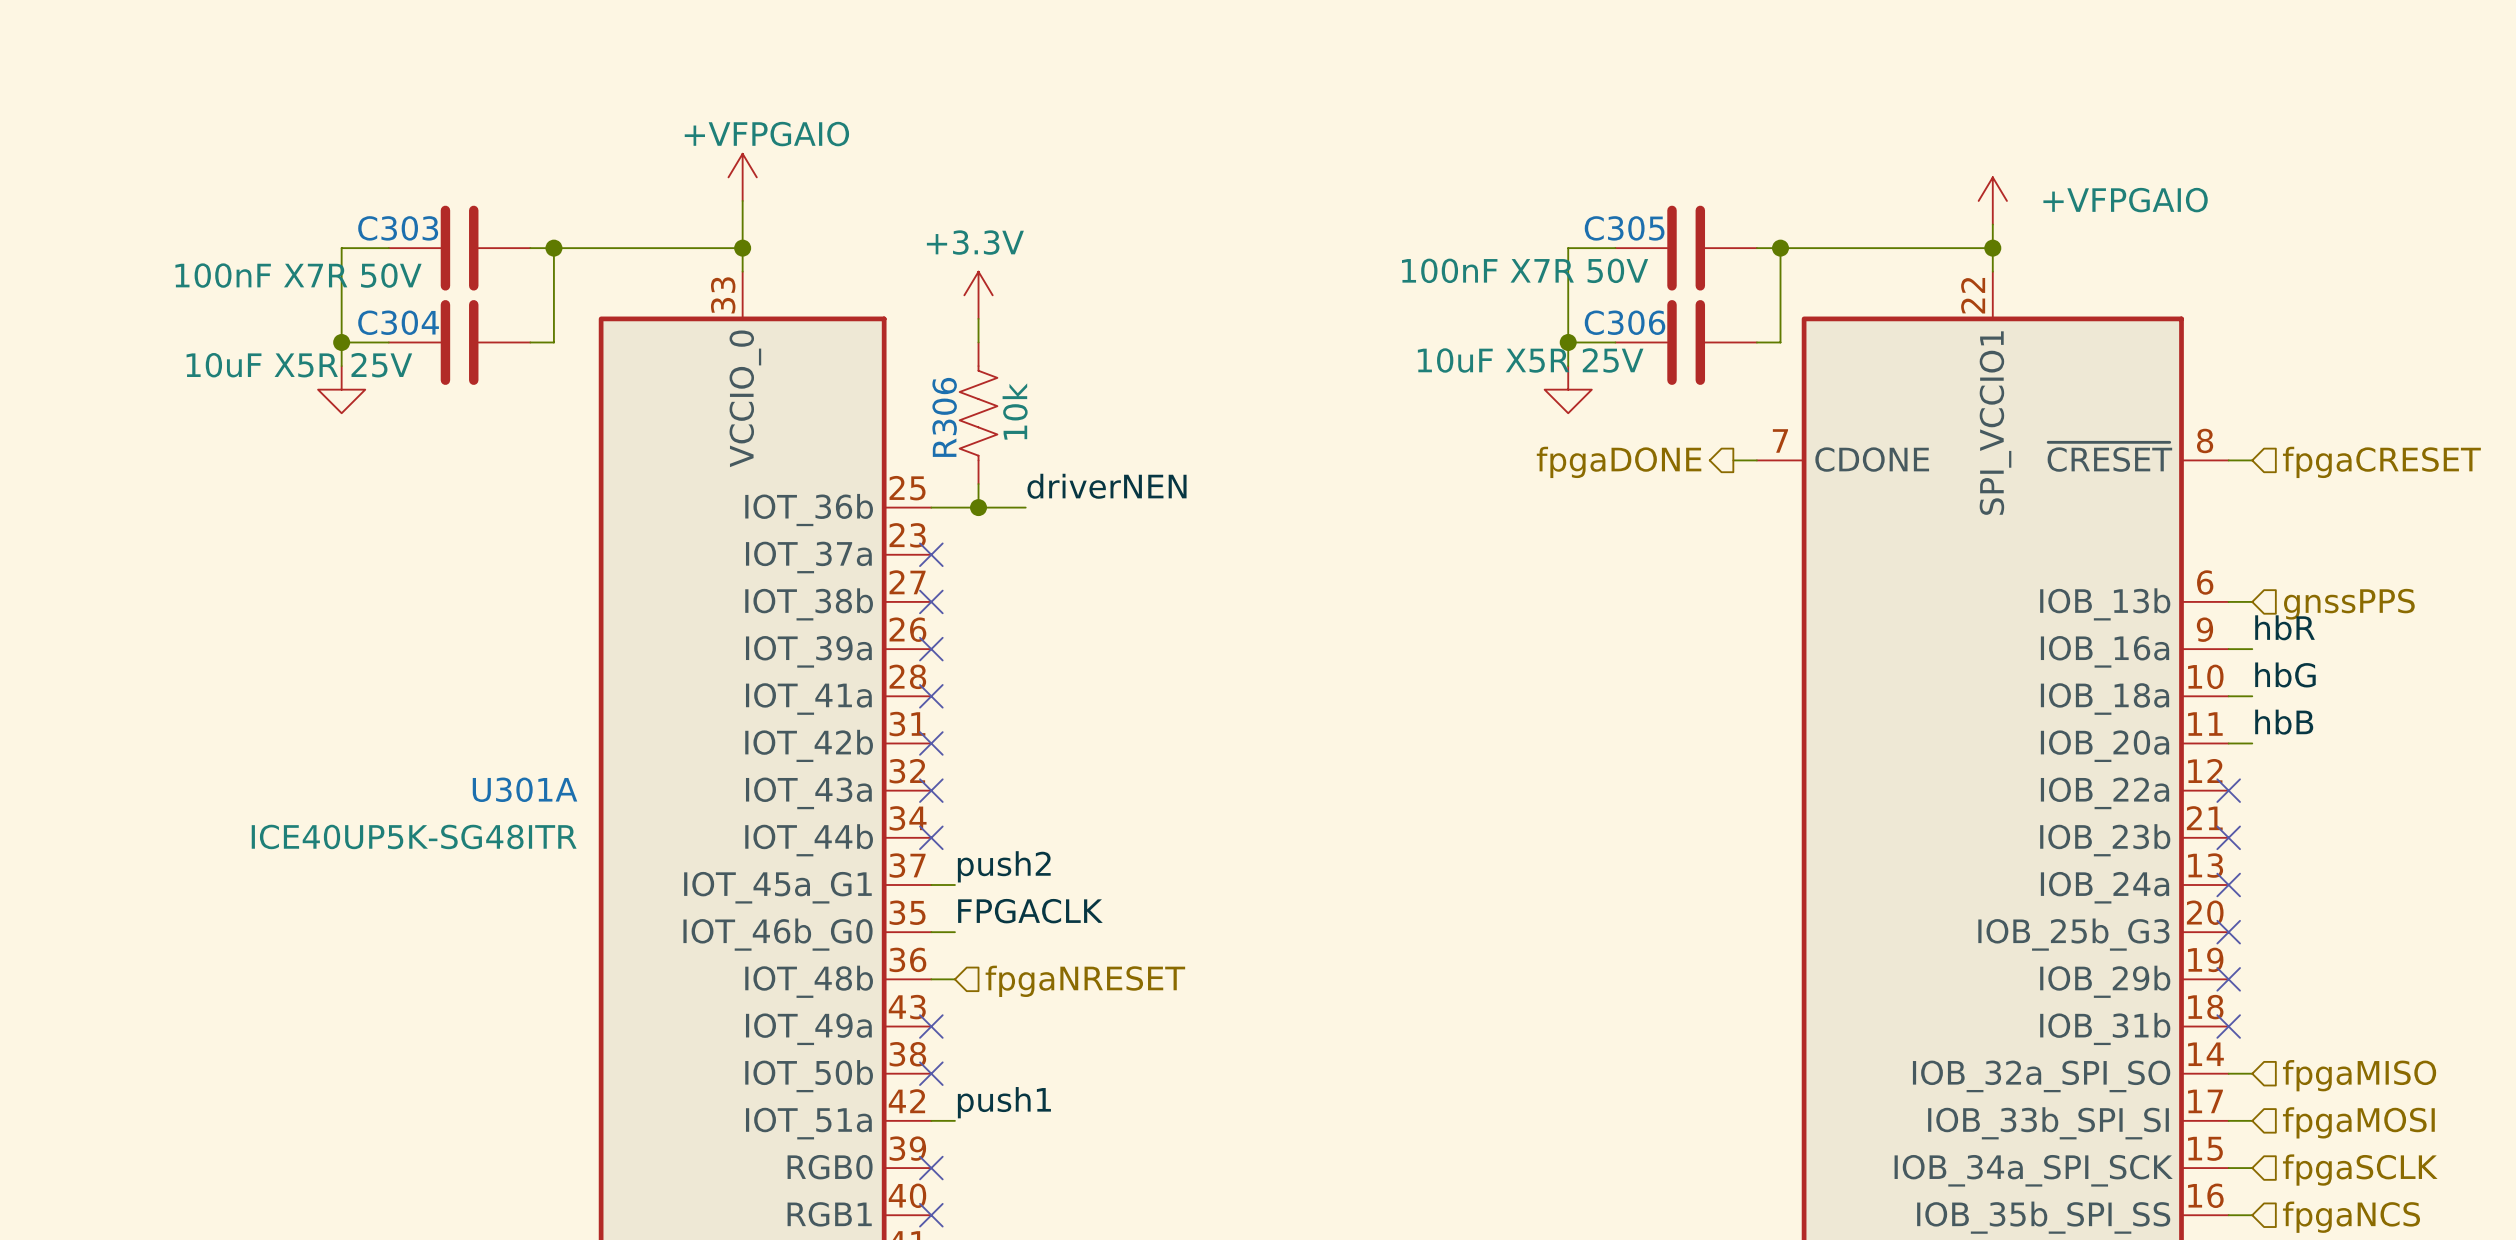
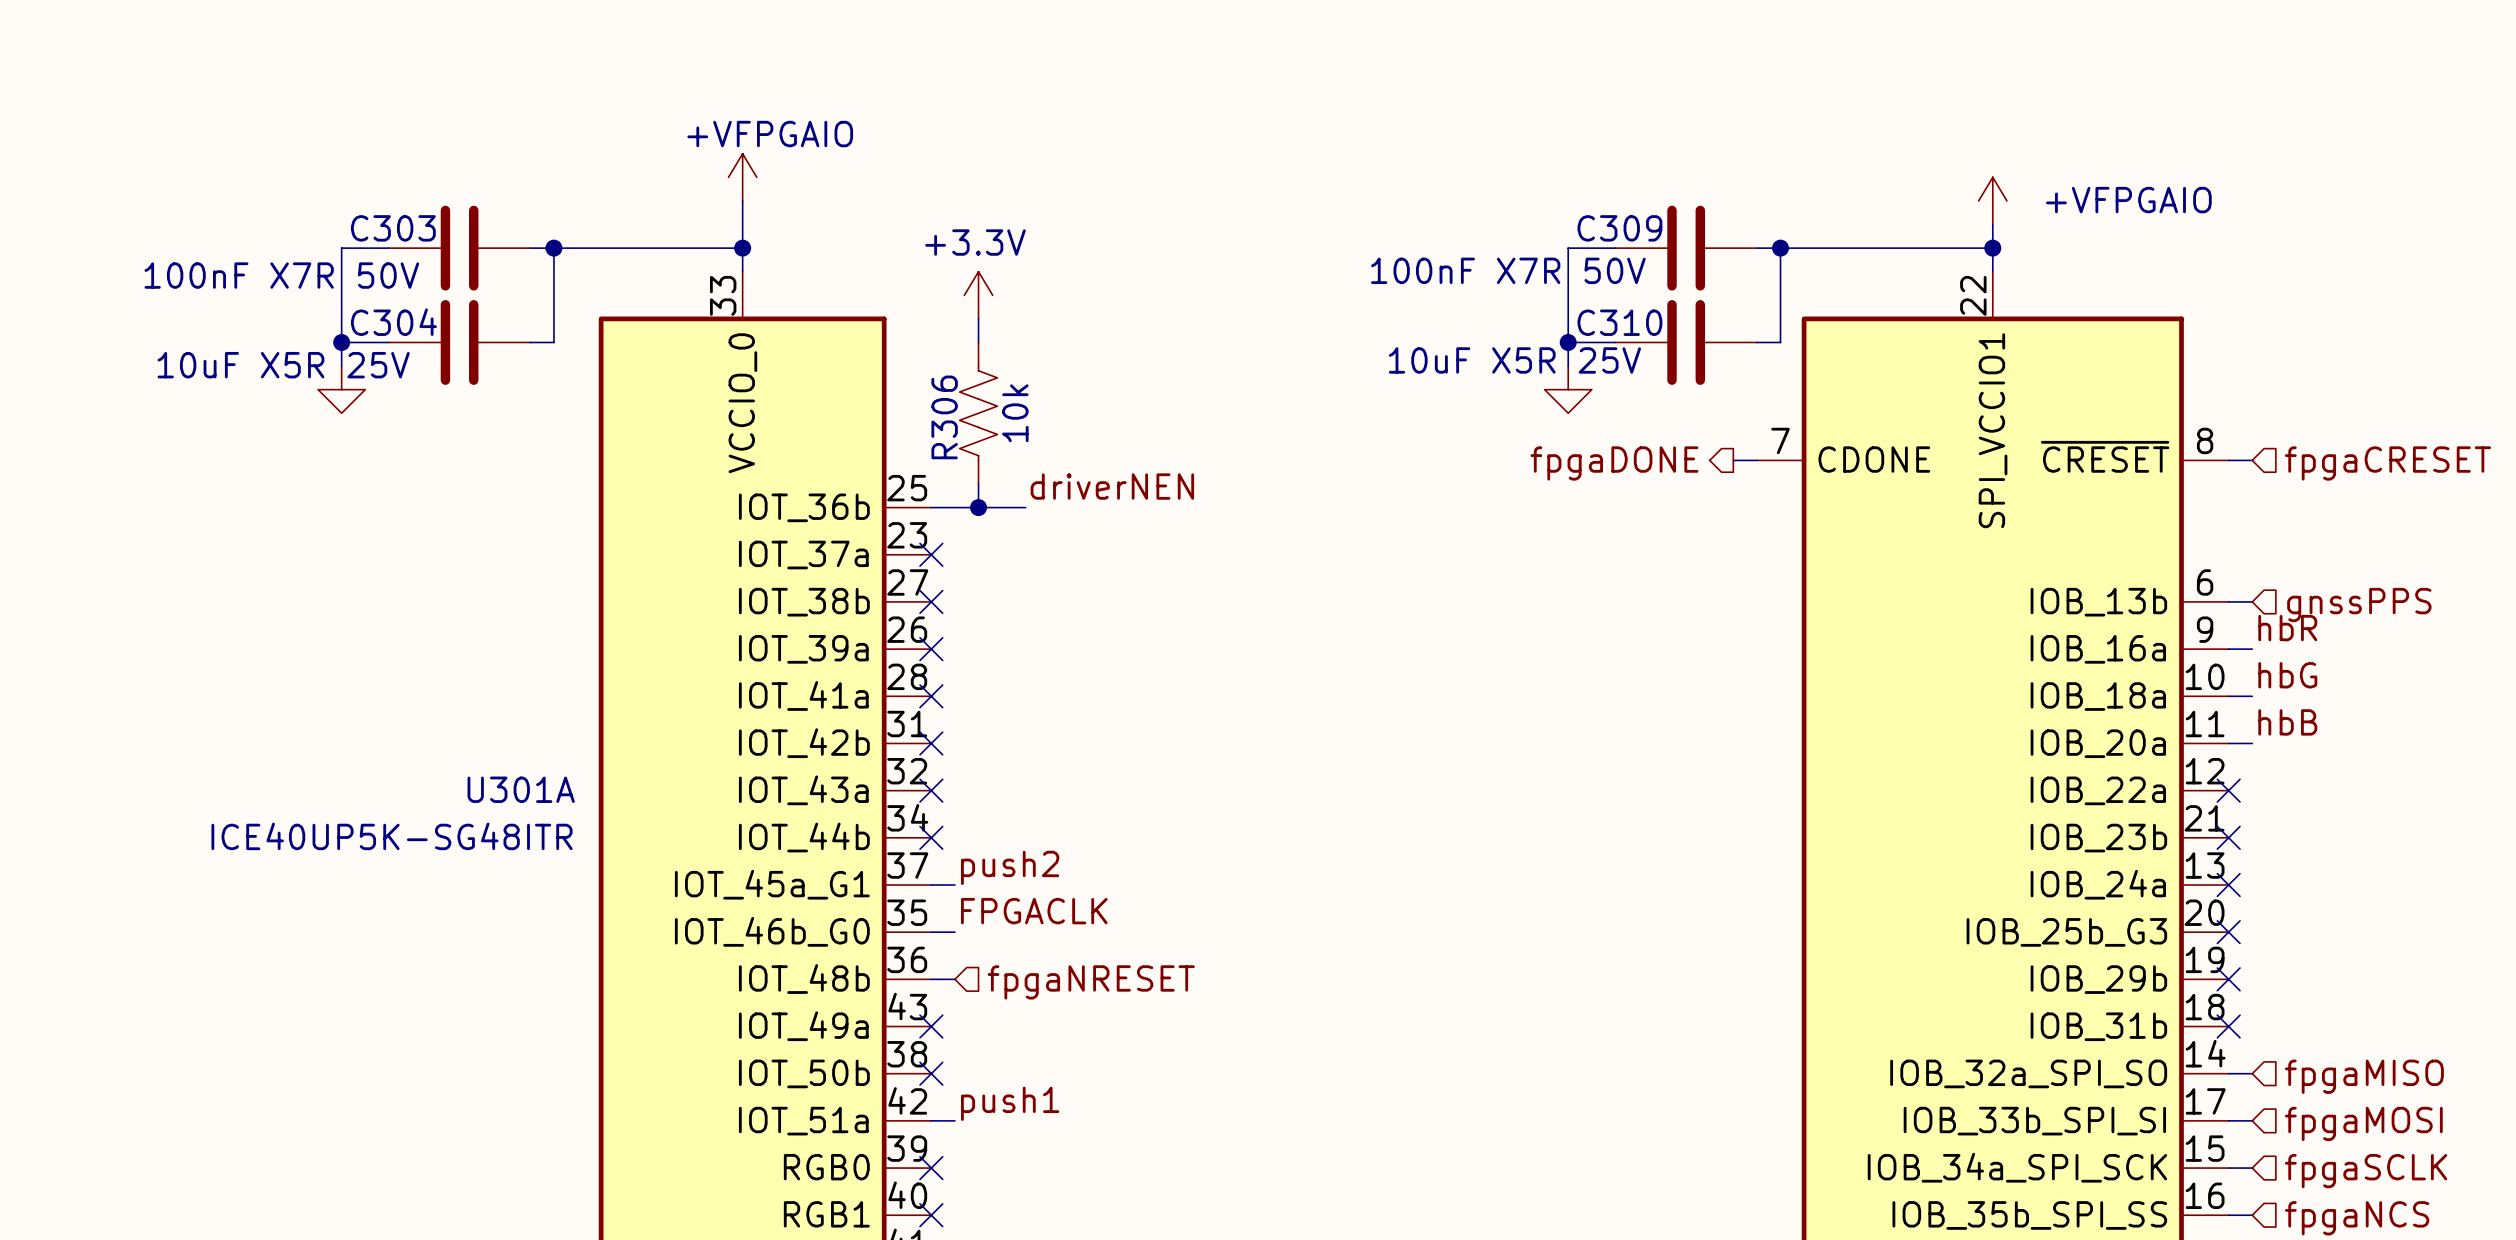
C305 name: C305 (1624, 228) -> C309 (1619, 228)
C306 name: C306 (1625, 322) -> C310 (1619, 322)

